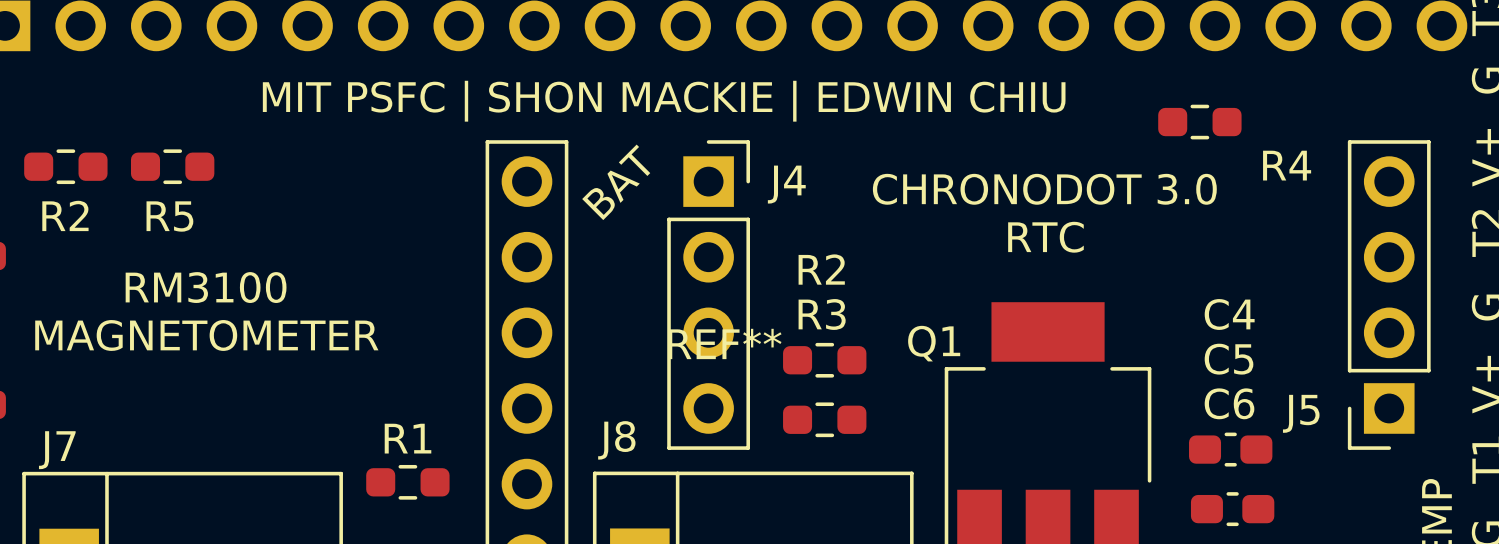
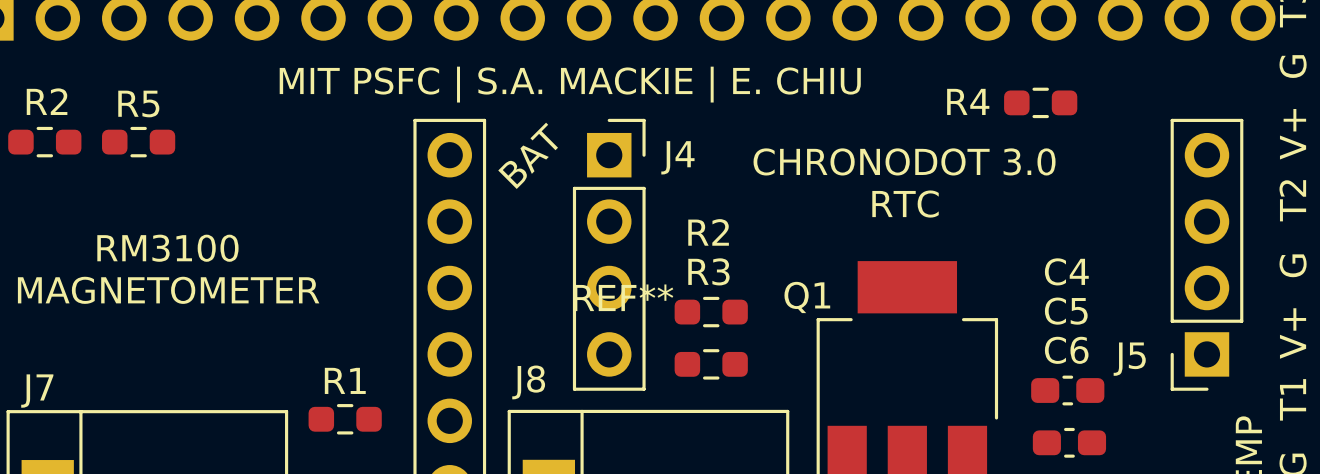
text: MIT PSFC | SHON MACKIE | EDWIN CHIU (664, 101) -> MIT PSFC | S.A. MACKIE | E. CHIU (570, 84)
R4 name position: R4 (1287, 165) -> R4 (968, 101)
R2 name position: R2 (65, 215) -> R2 (47, 101)
R5 name position: R5 (169, 216) -> R5 (138, 104)

